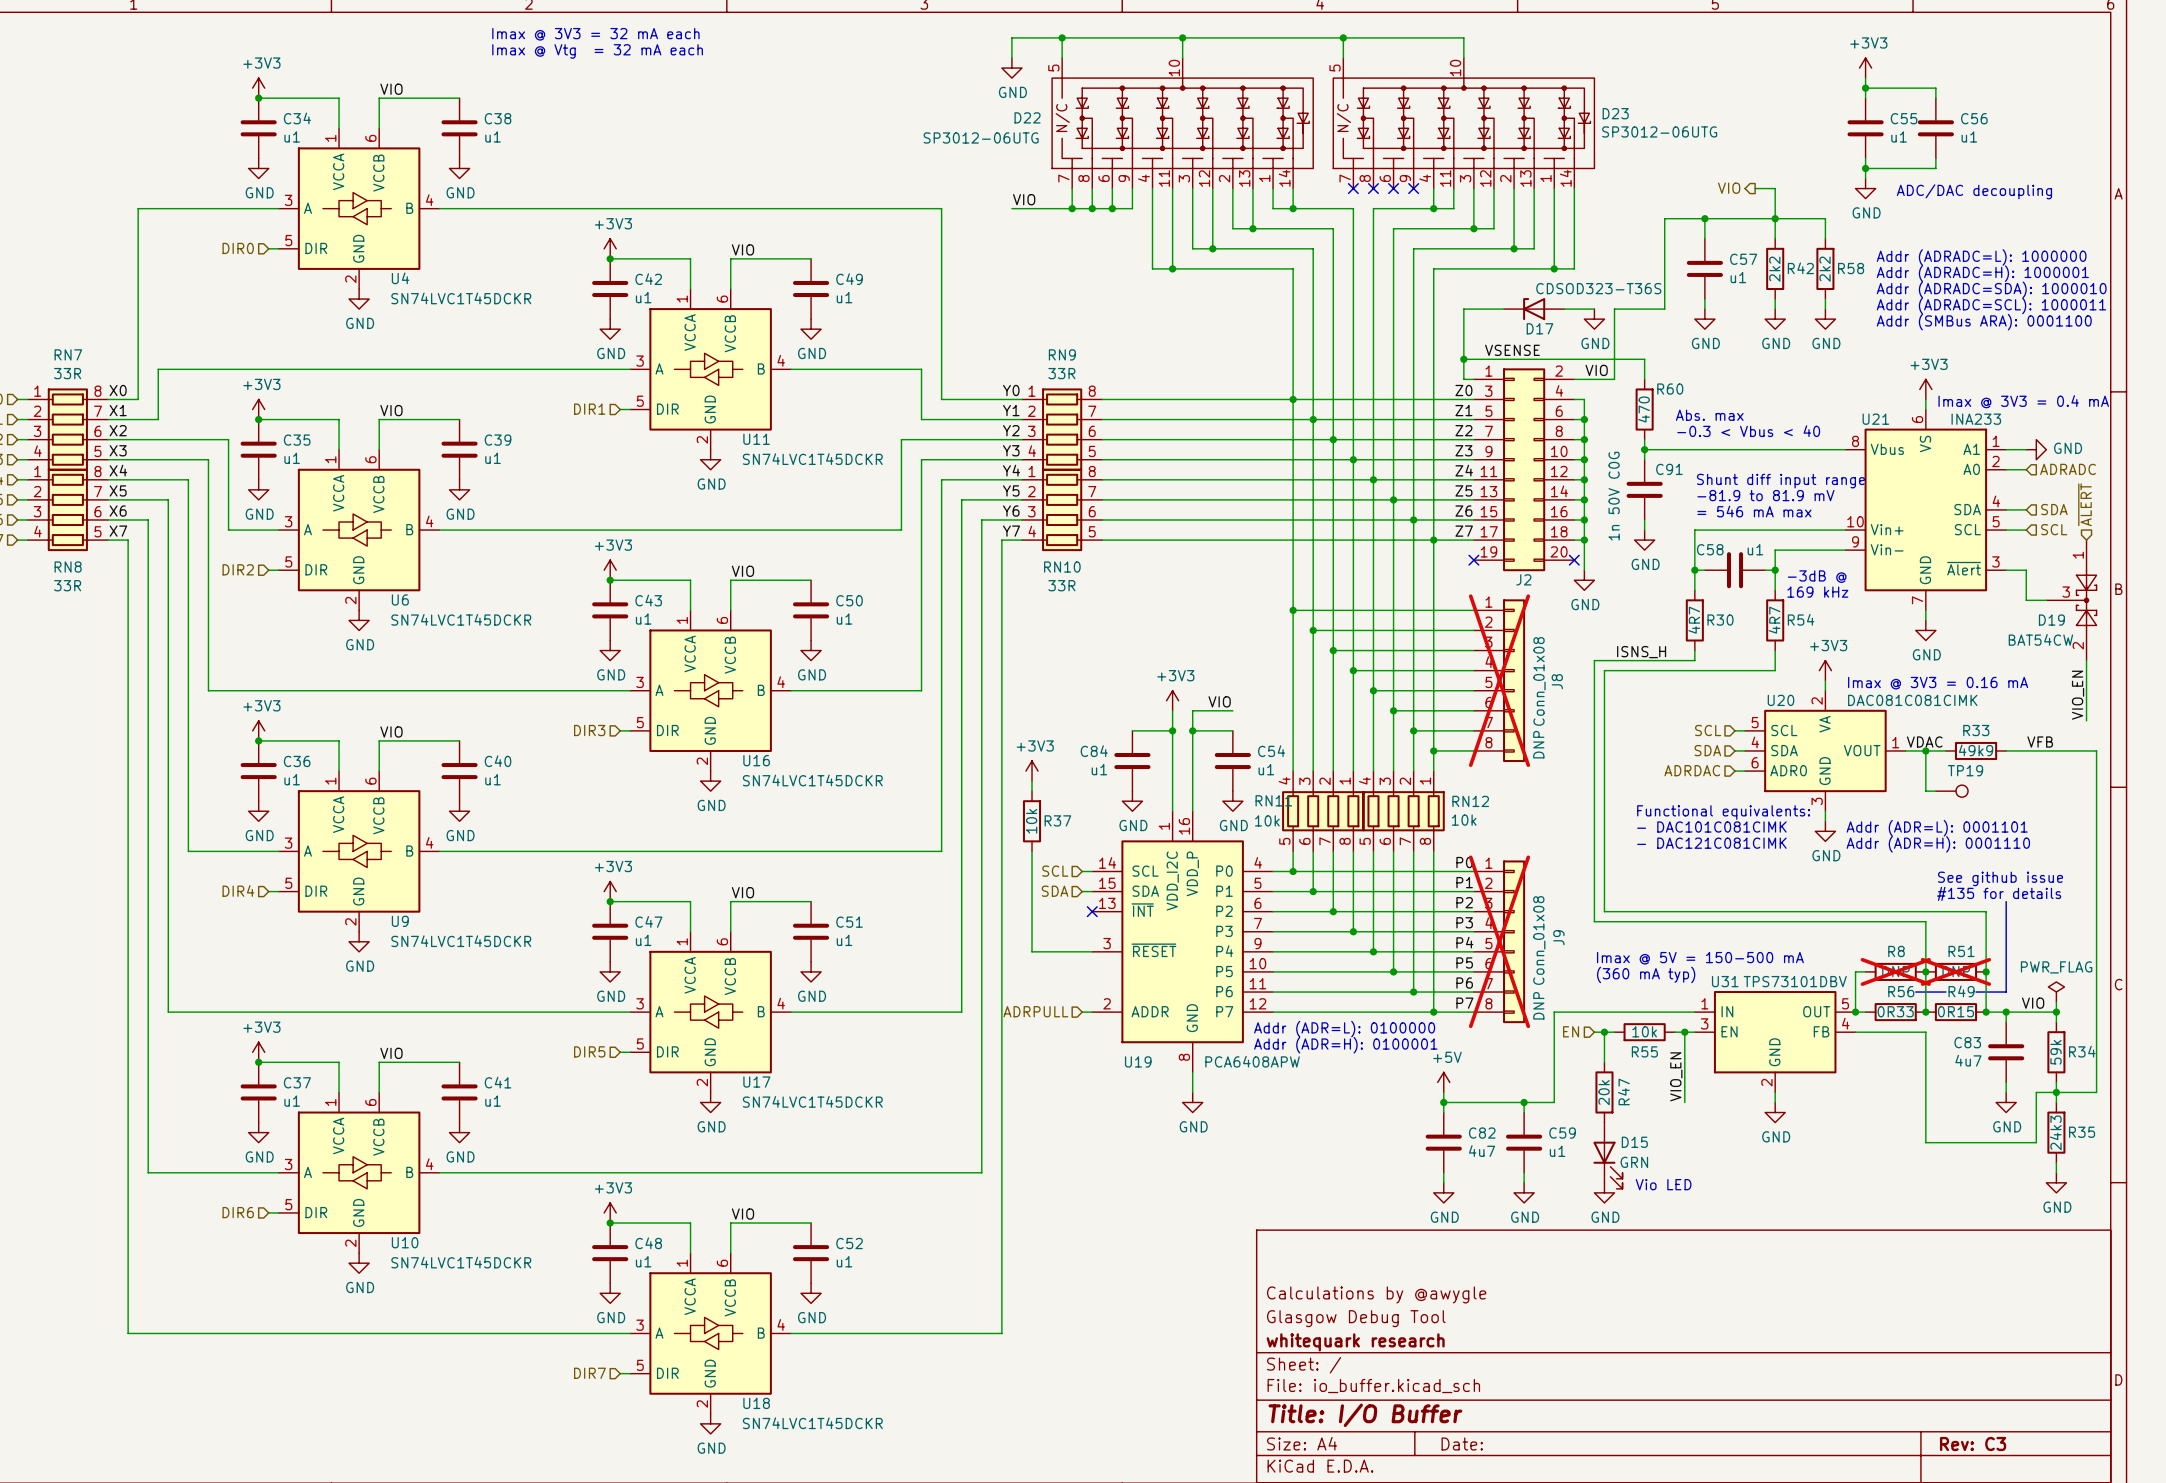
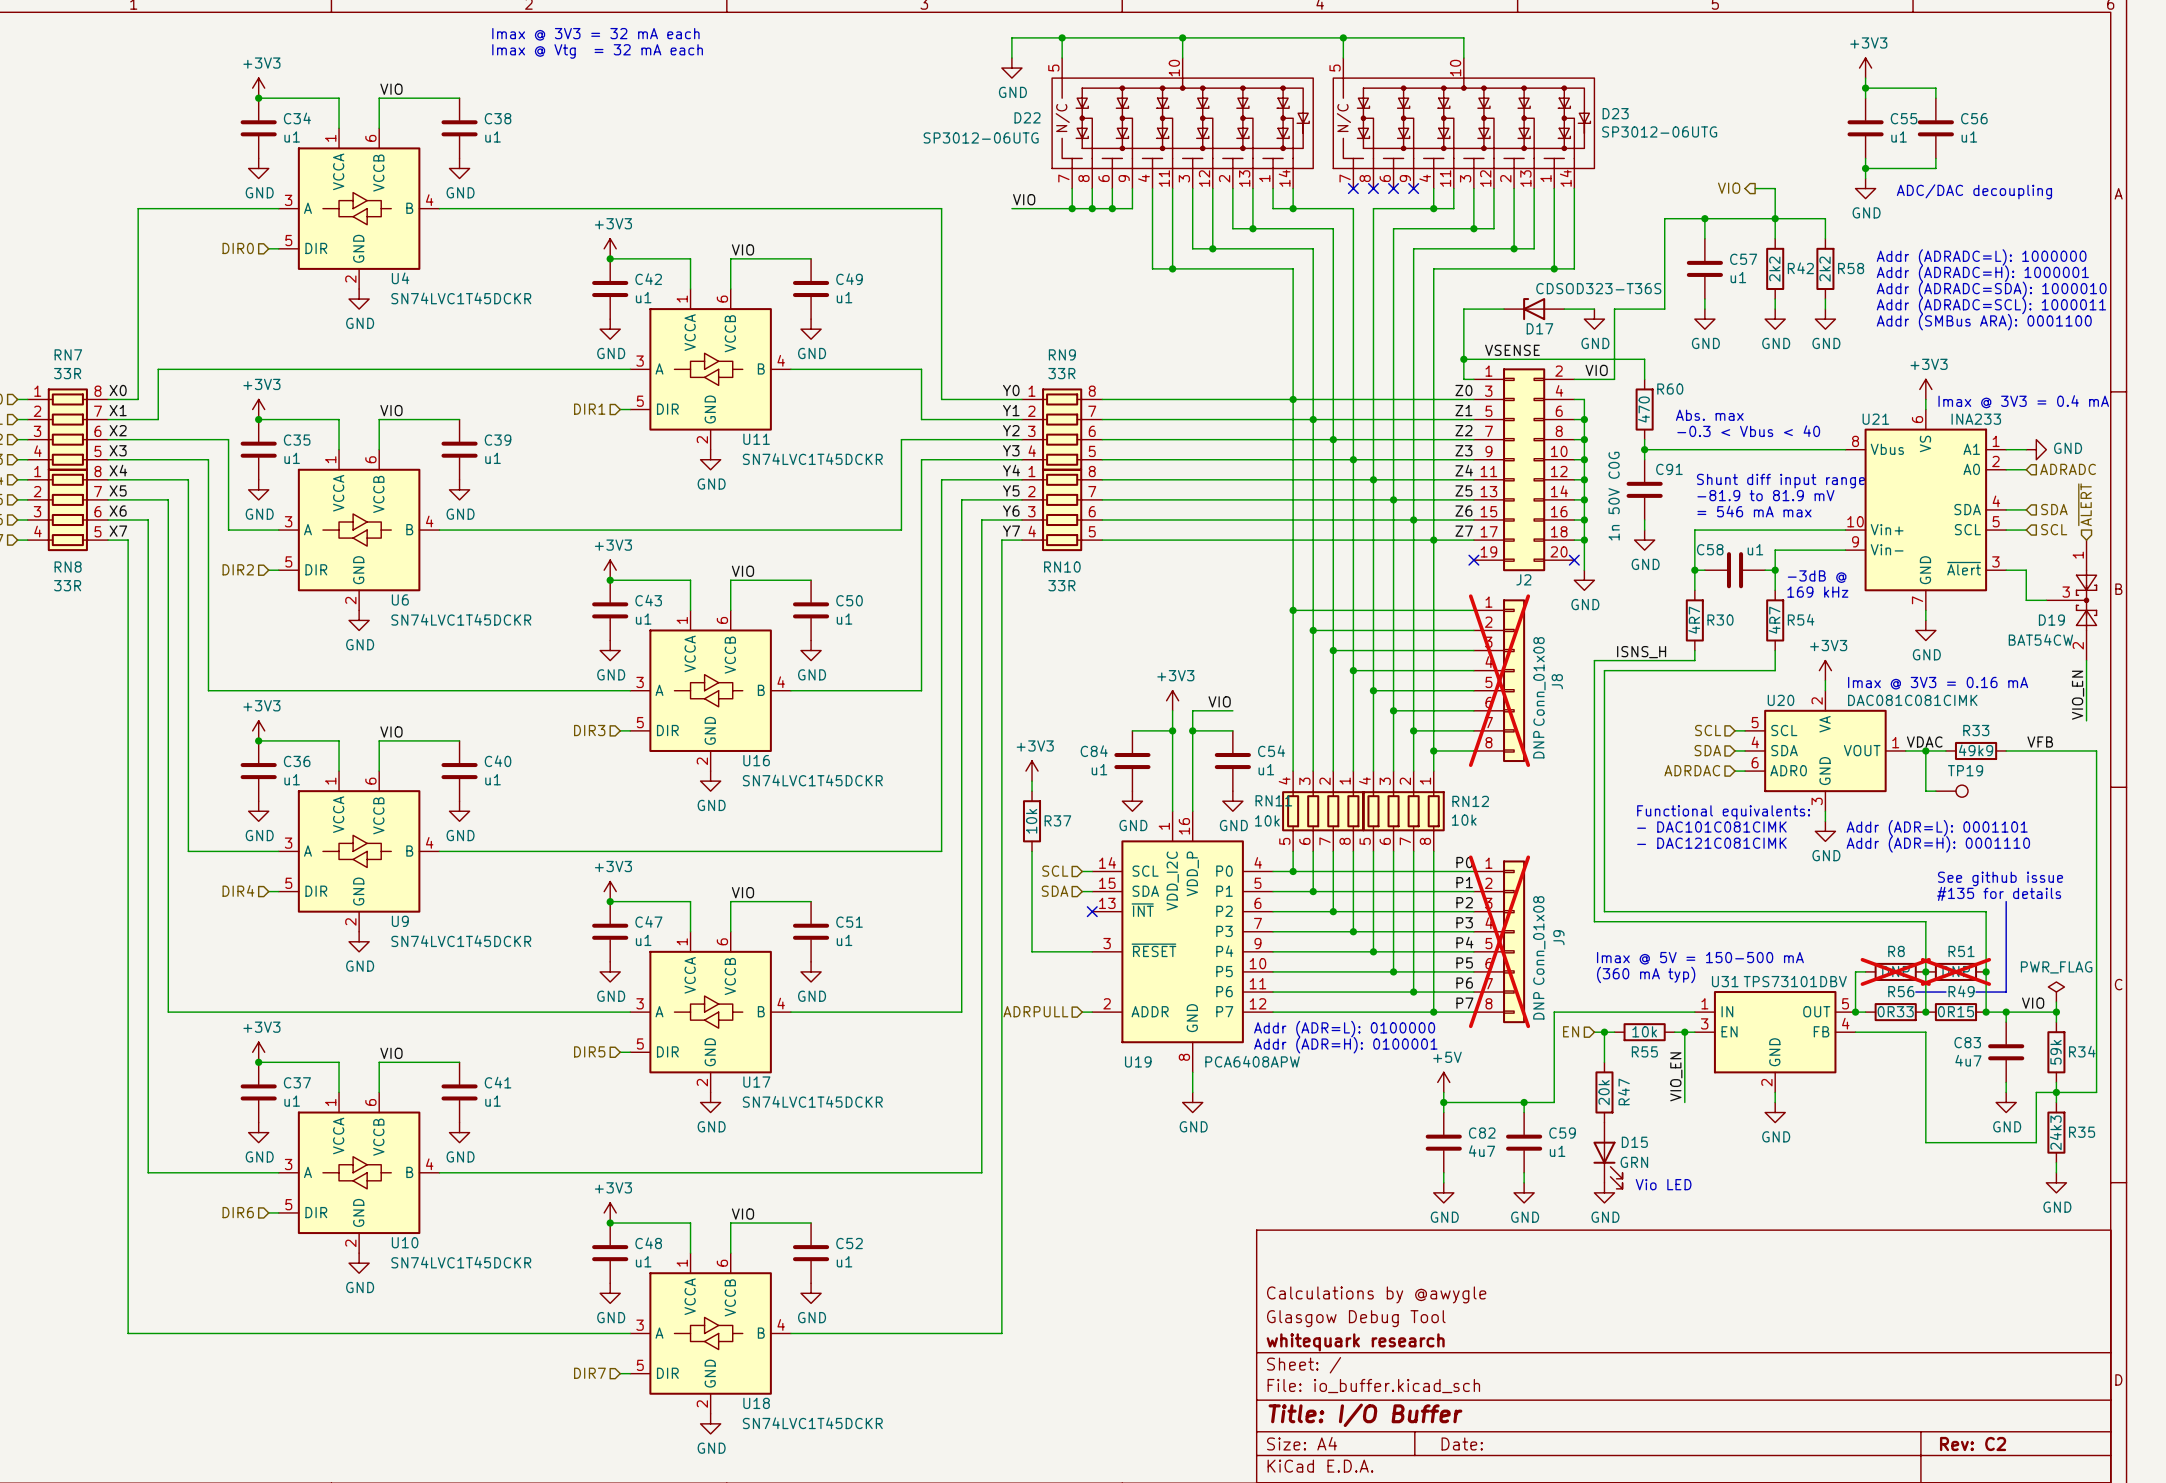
title block: Rev: C3 (1973, 1443) -> Rev: C2 (1973, 1443)

